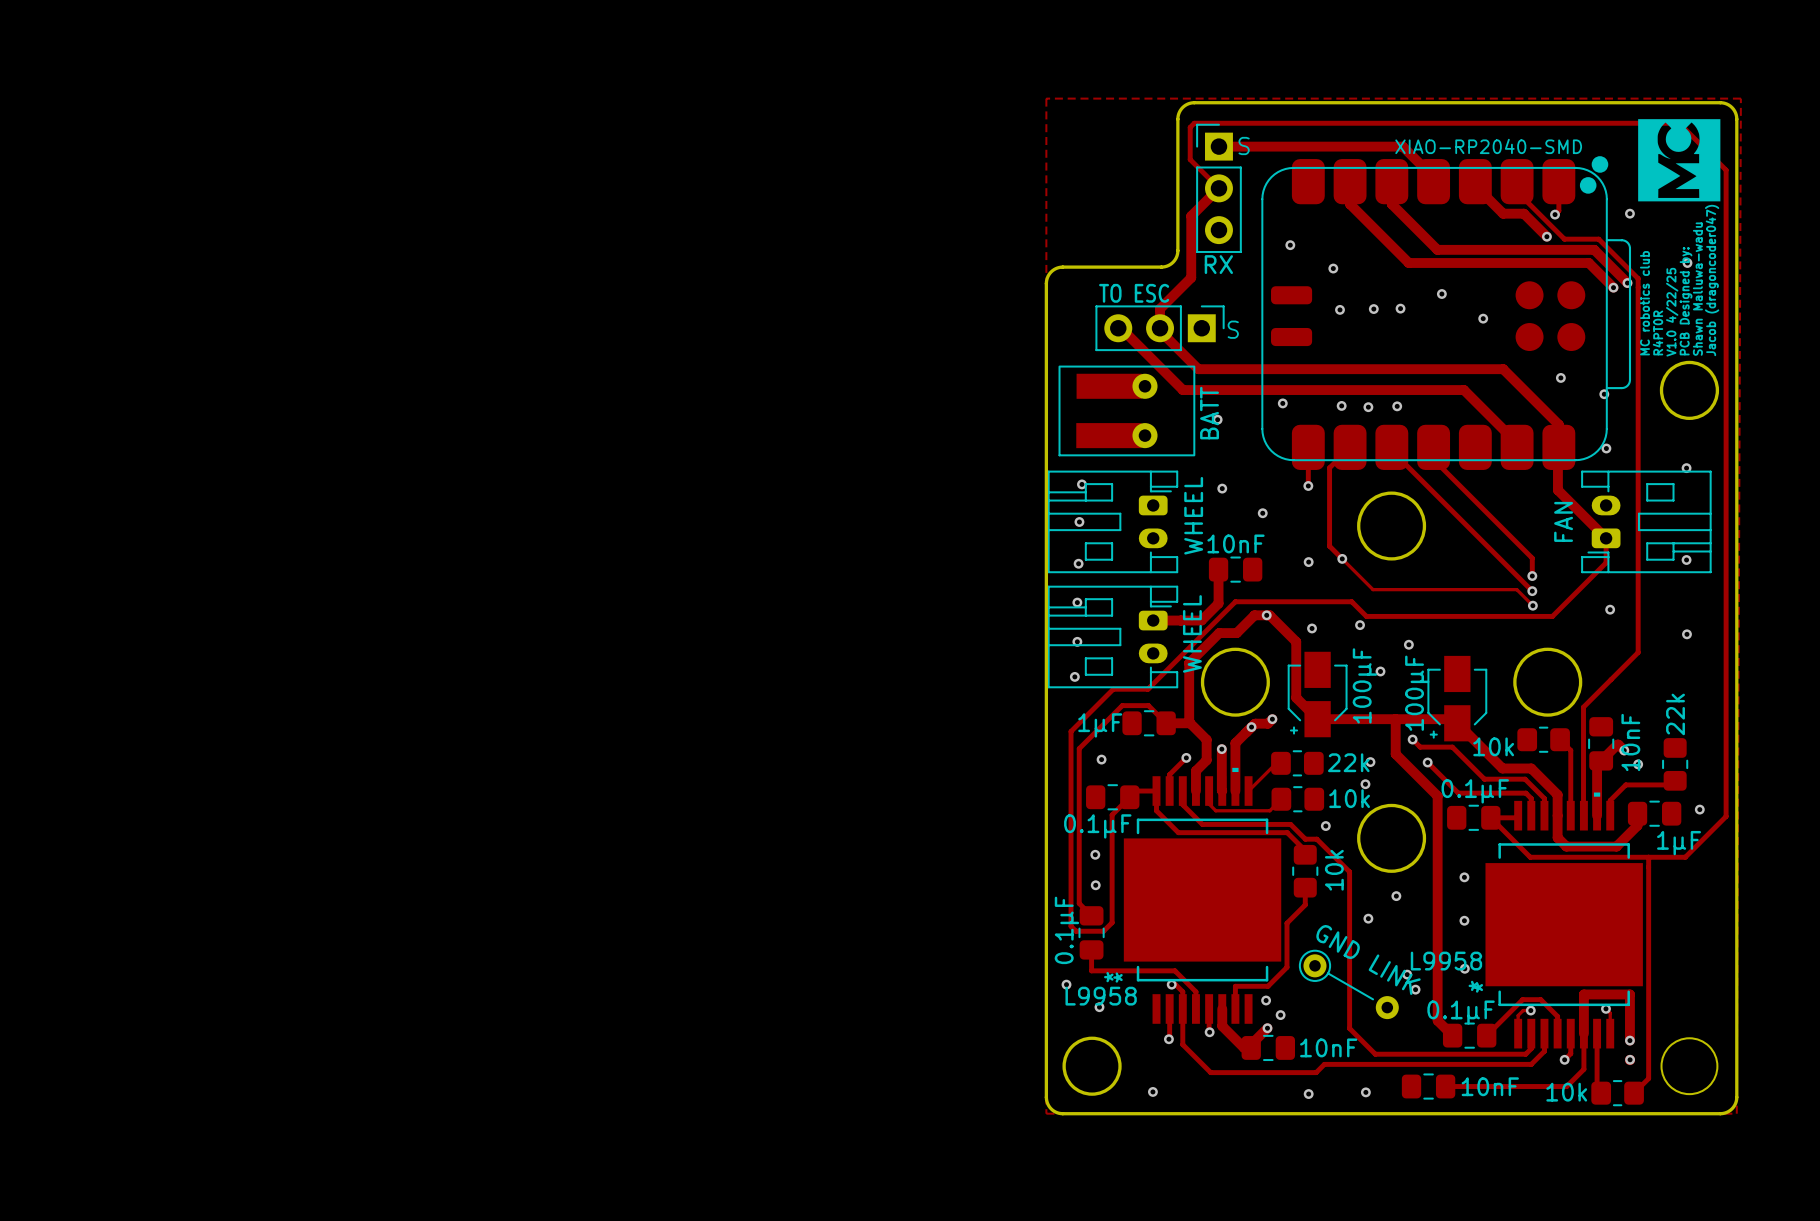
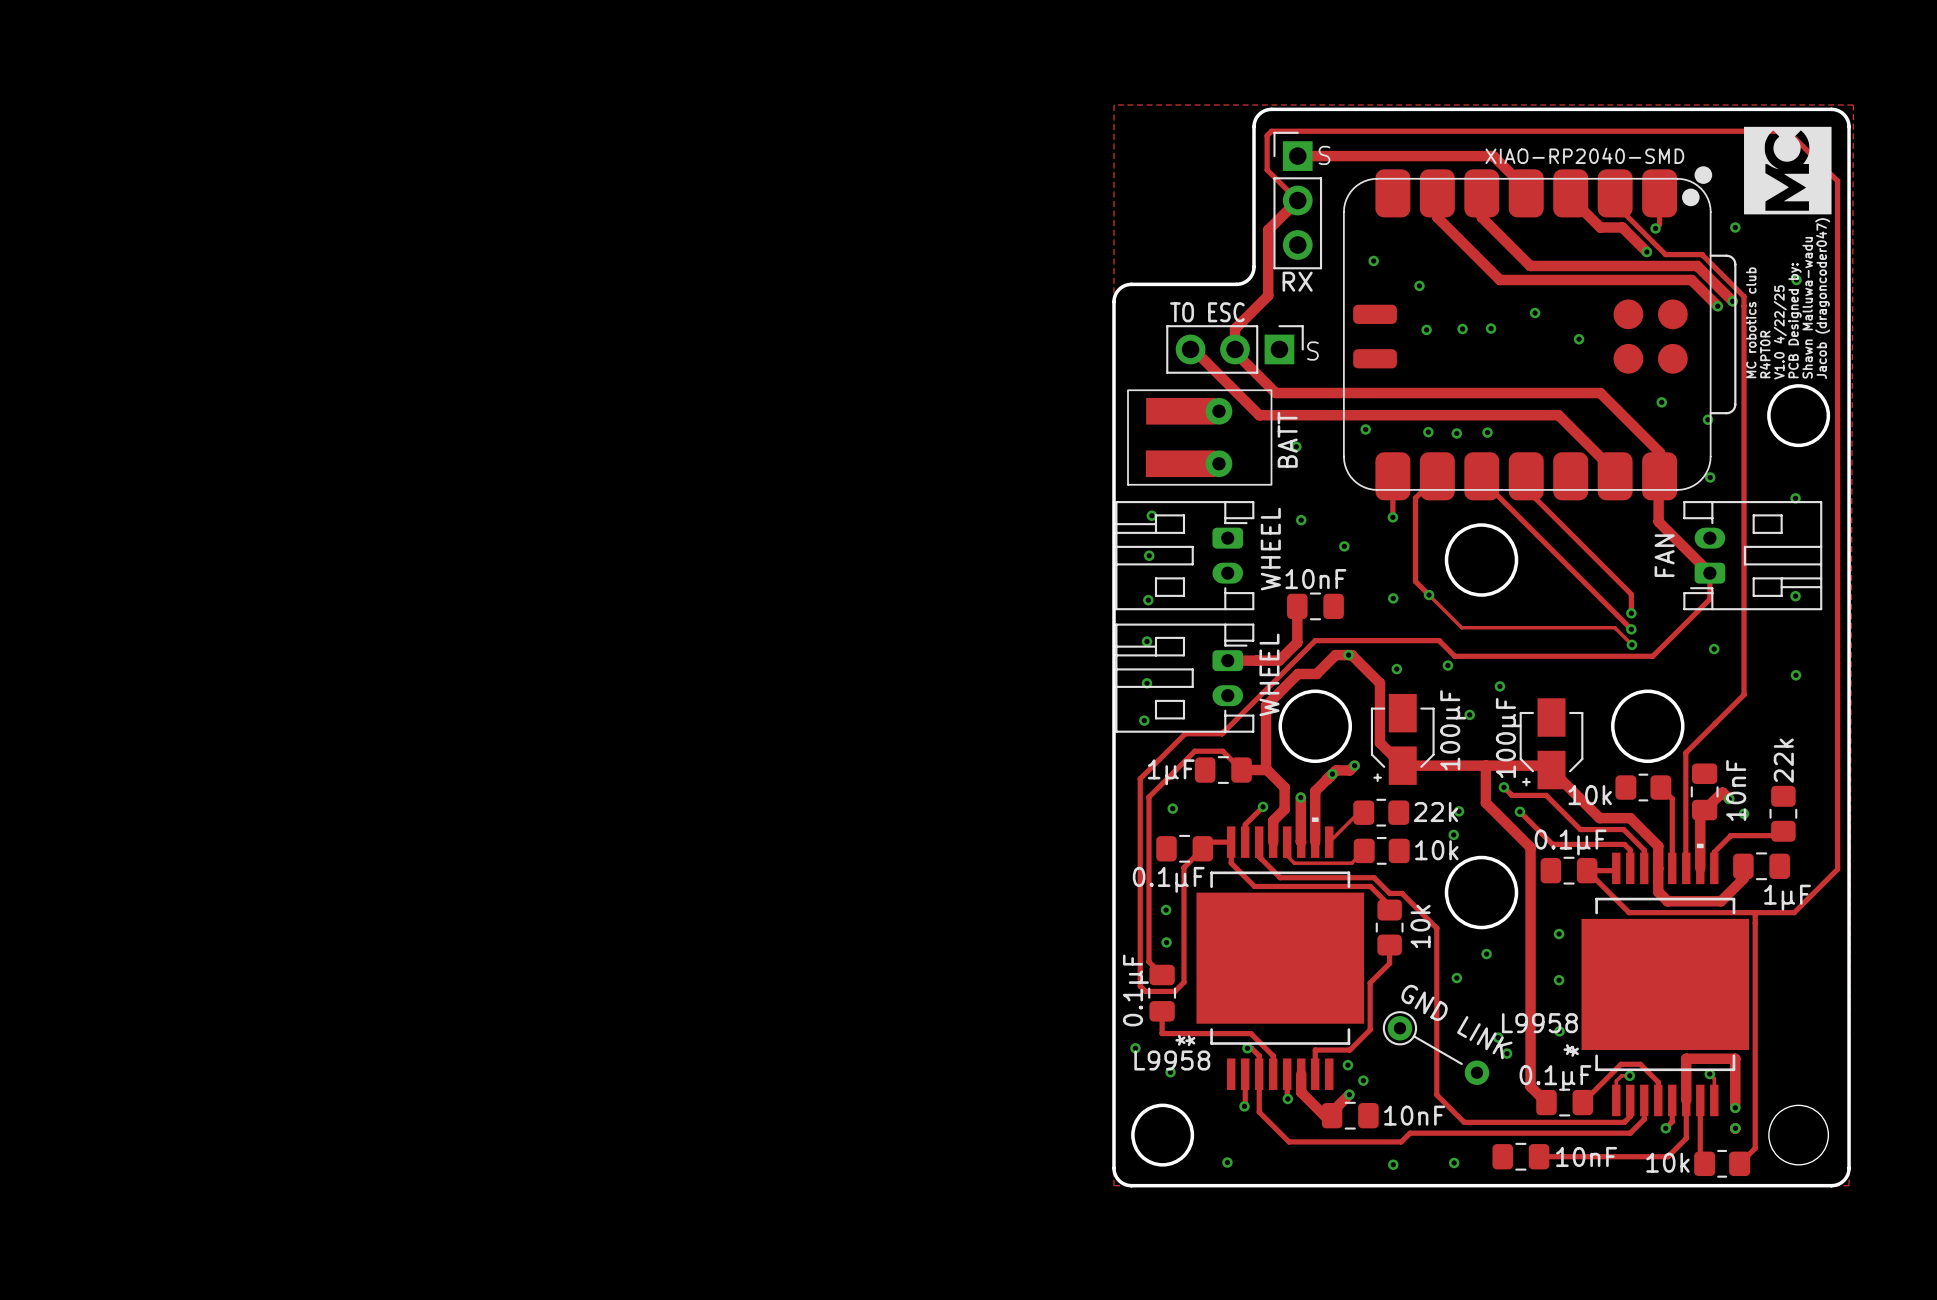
via: (1699, 809) -> none
via: (1325, 826) -> none

